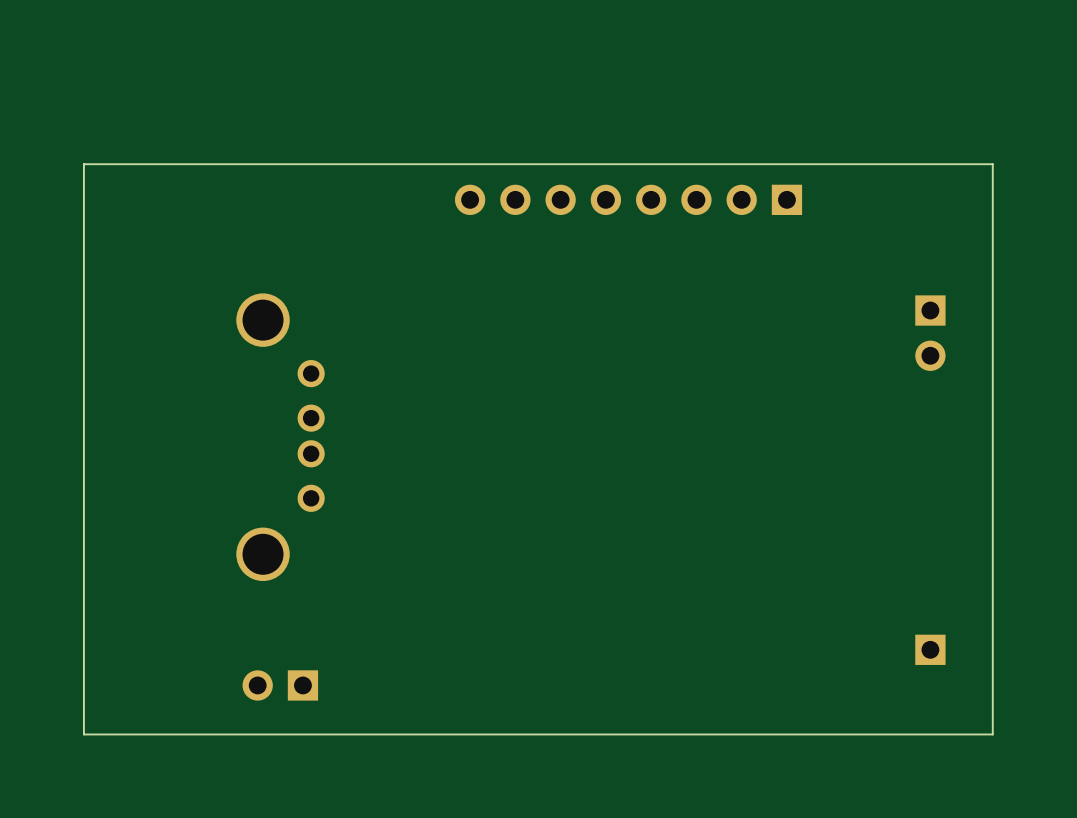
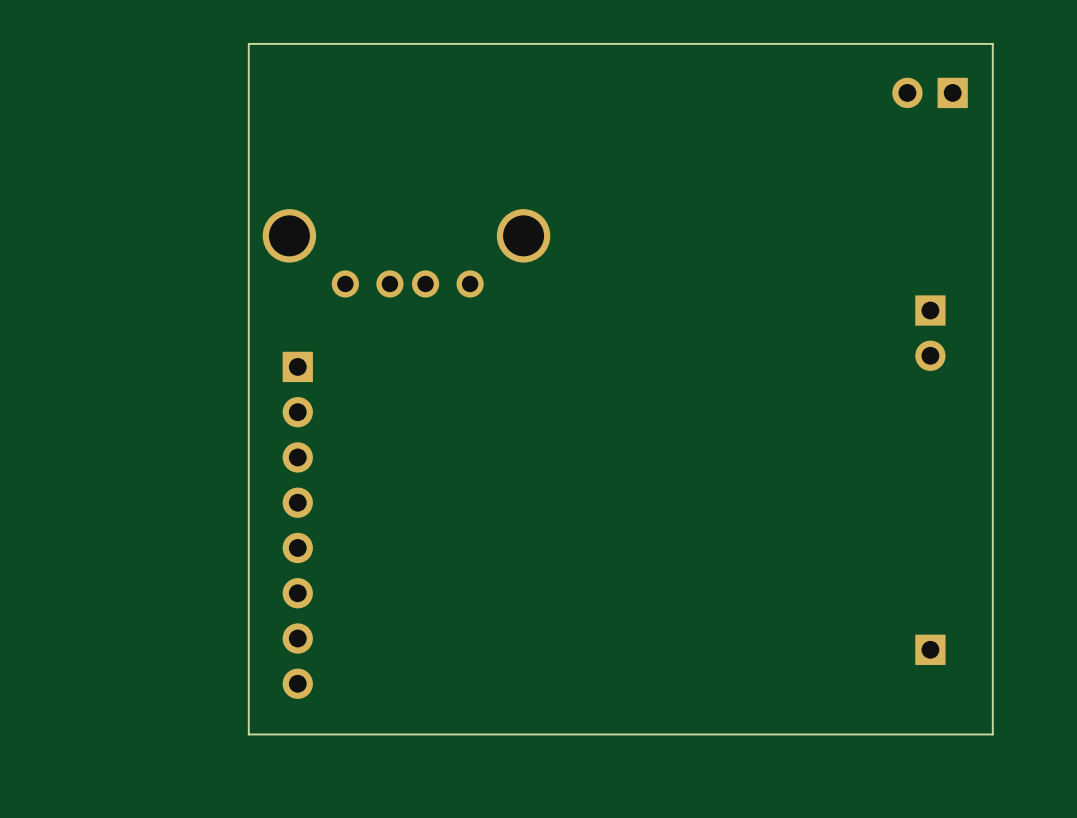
part: none -> (930, 92)
board edge: (992, 164) (83, 164) (83, 734) (248, 734) -> (992, 164) (992, 43) (248, 43) (248, 734)
part: (628, 199) -> none
part rotation: 0° (280, 437) -> 90° clockwise (406, 253)
part position: (280, 437) -> (406, 253)
part: none -> (297, 525)
part: (280, 685) -> none

